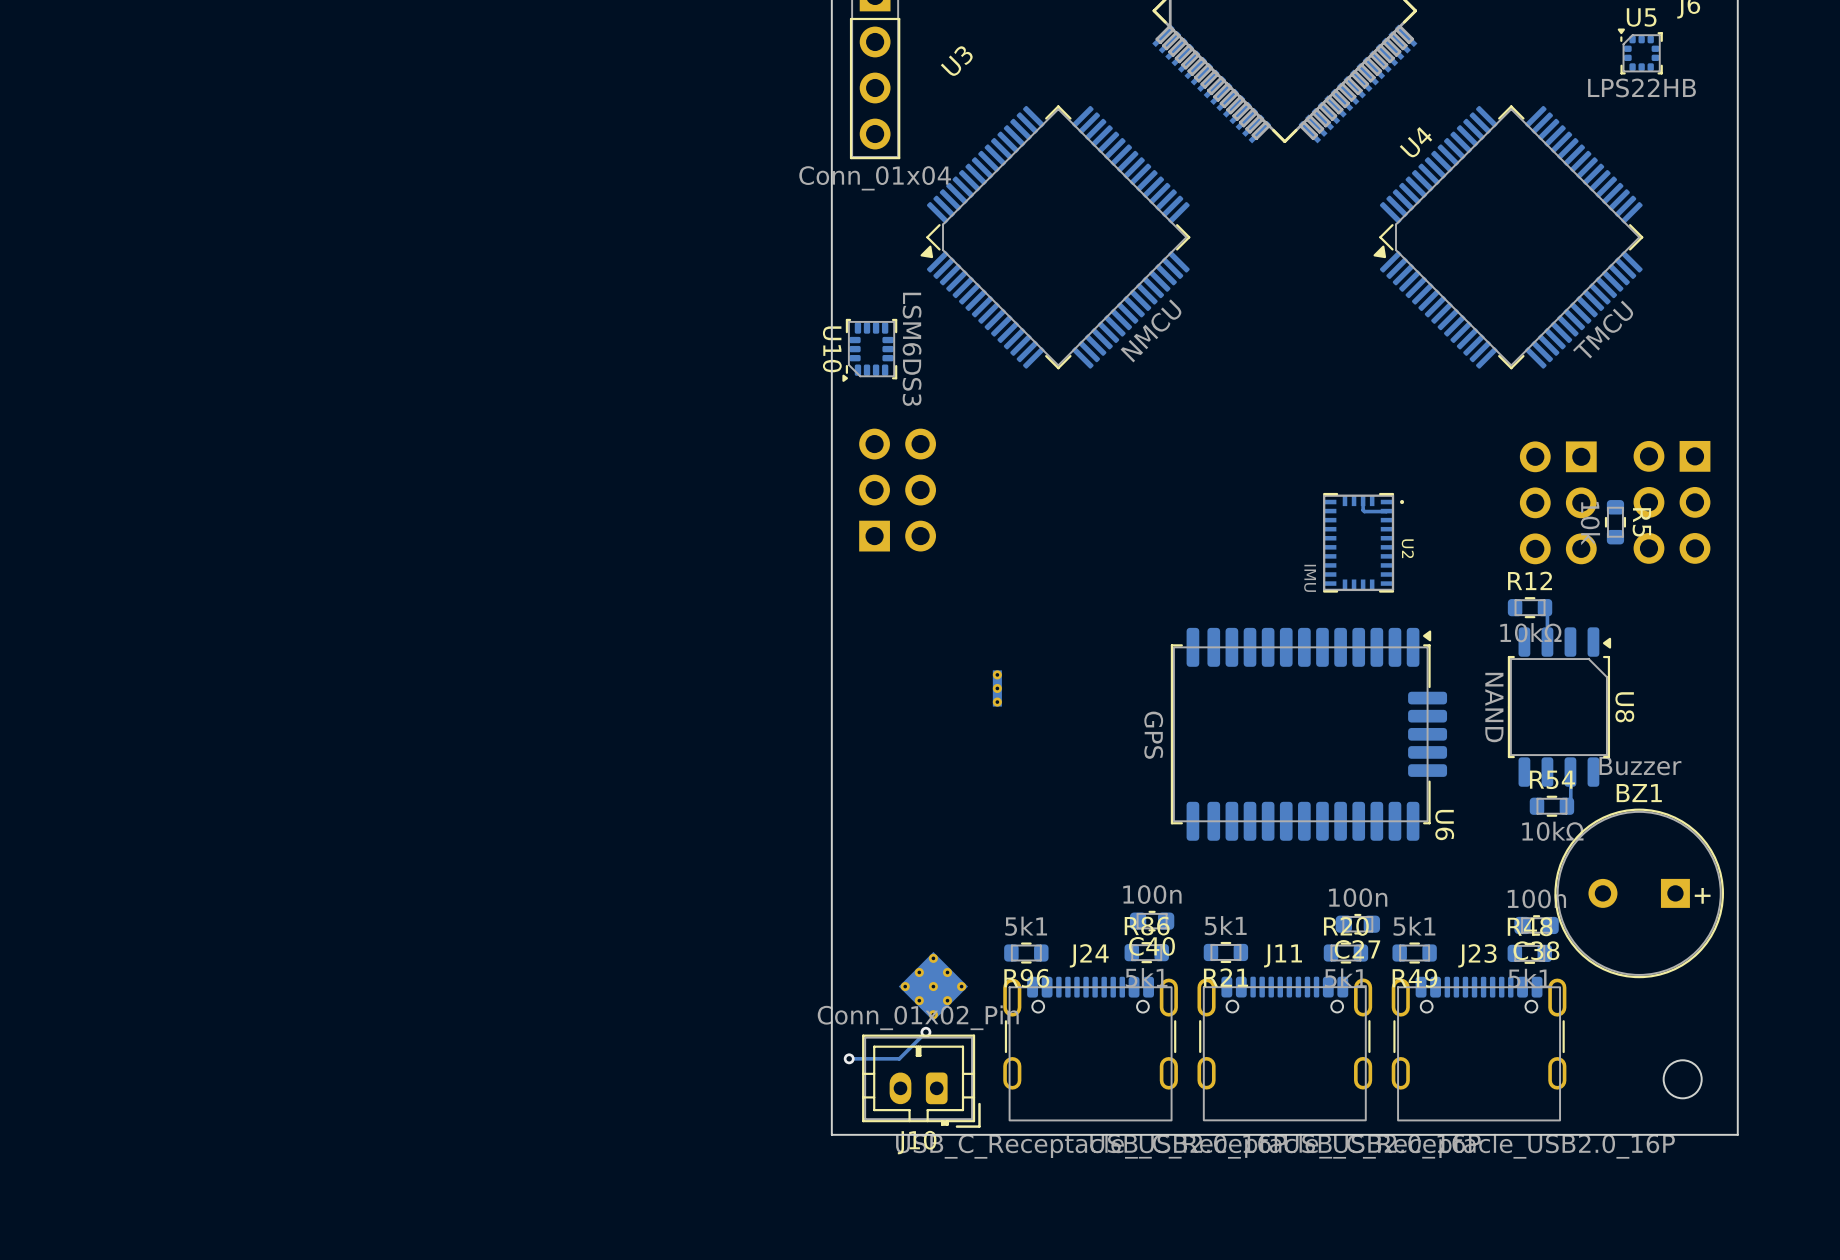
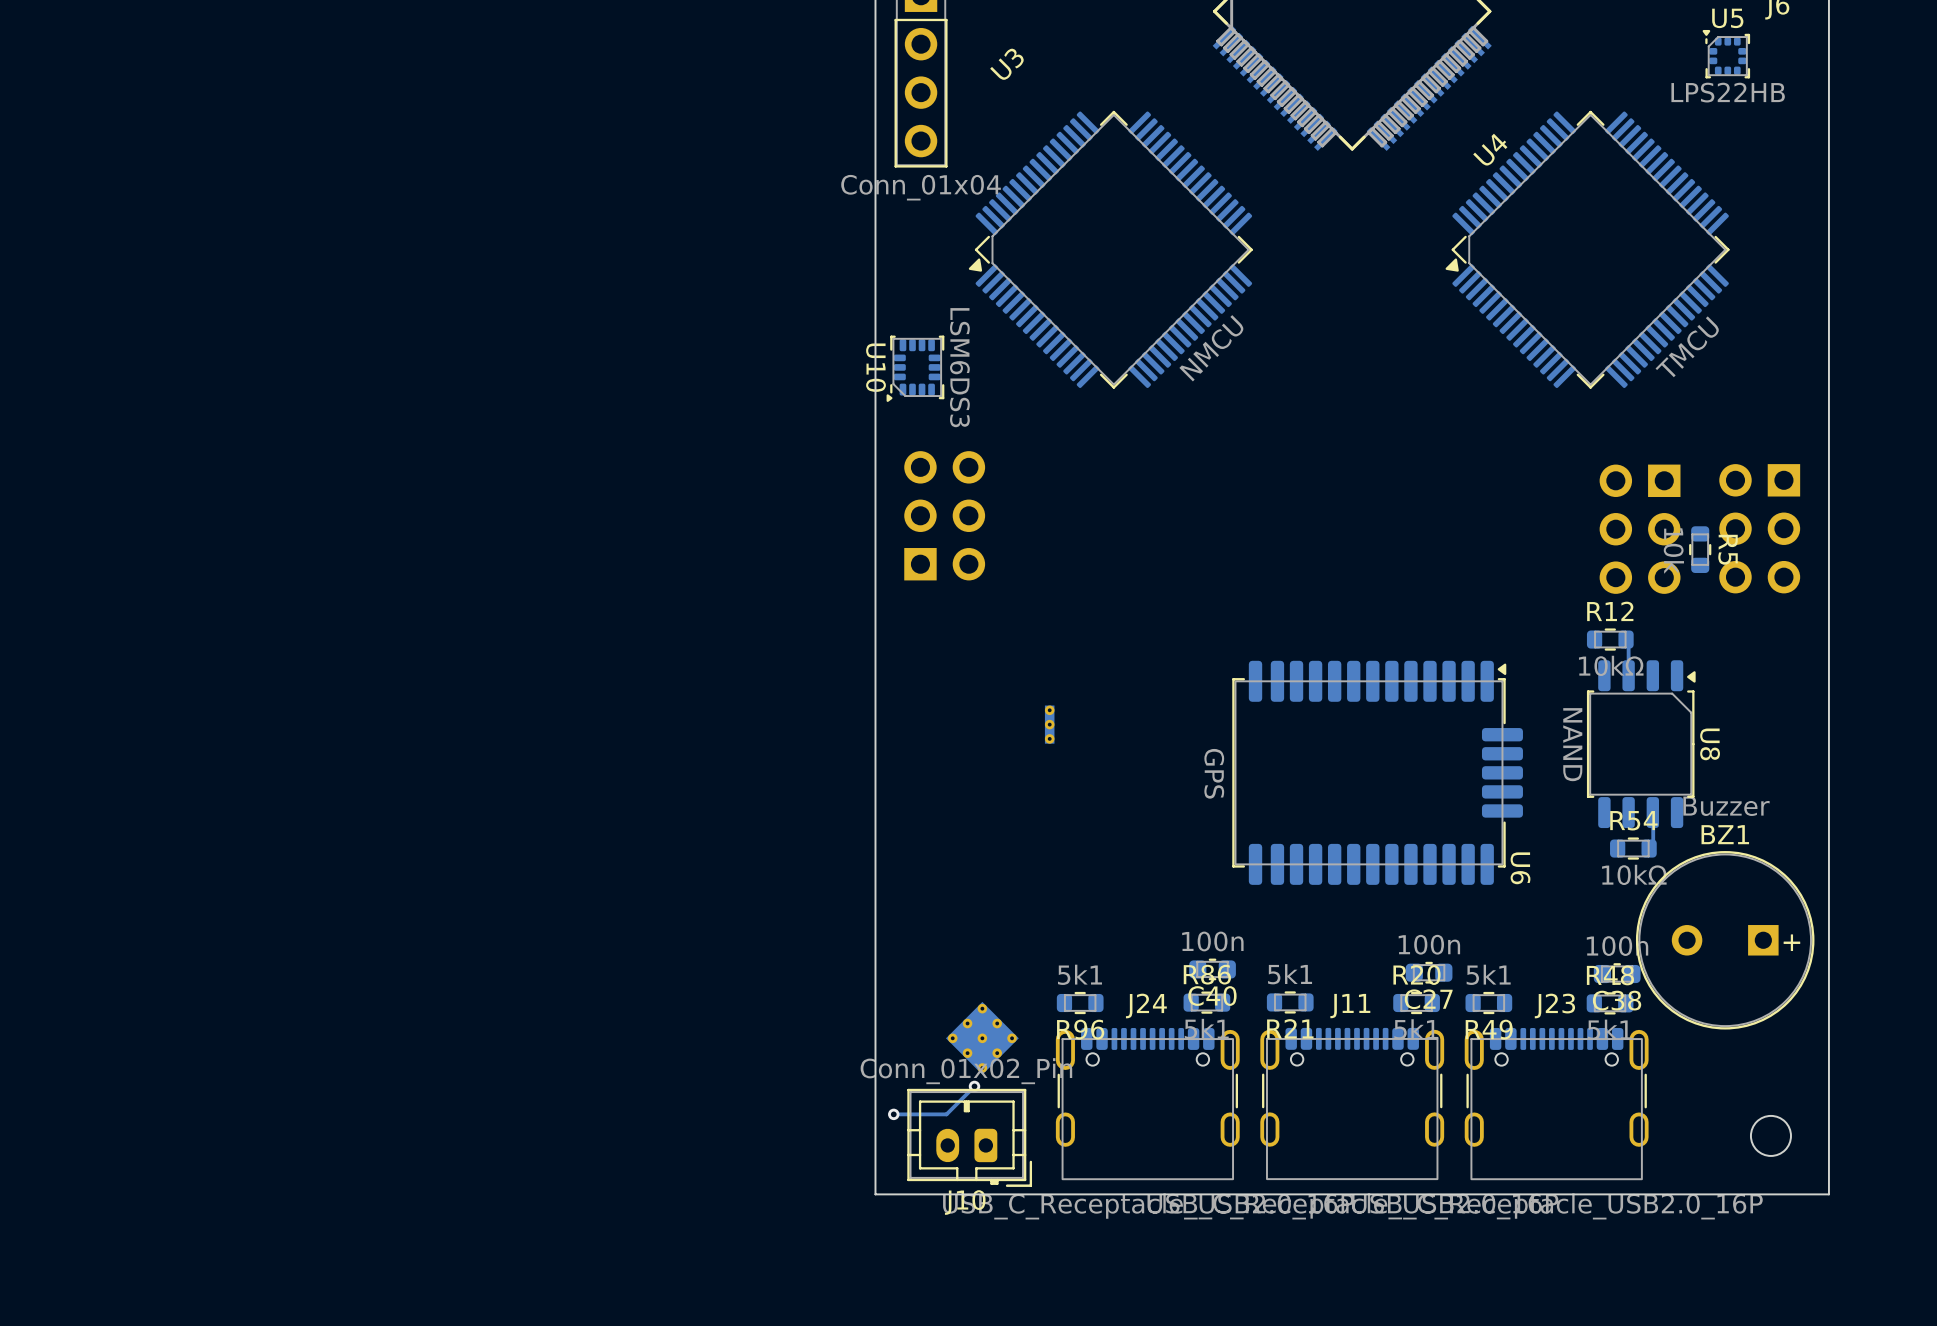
track: (1363, 500) (1364, 511) (1386, 511) -> none
U2: IMU (1363, 542) -> none

